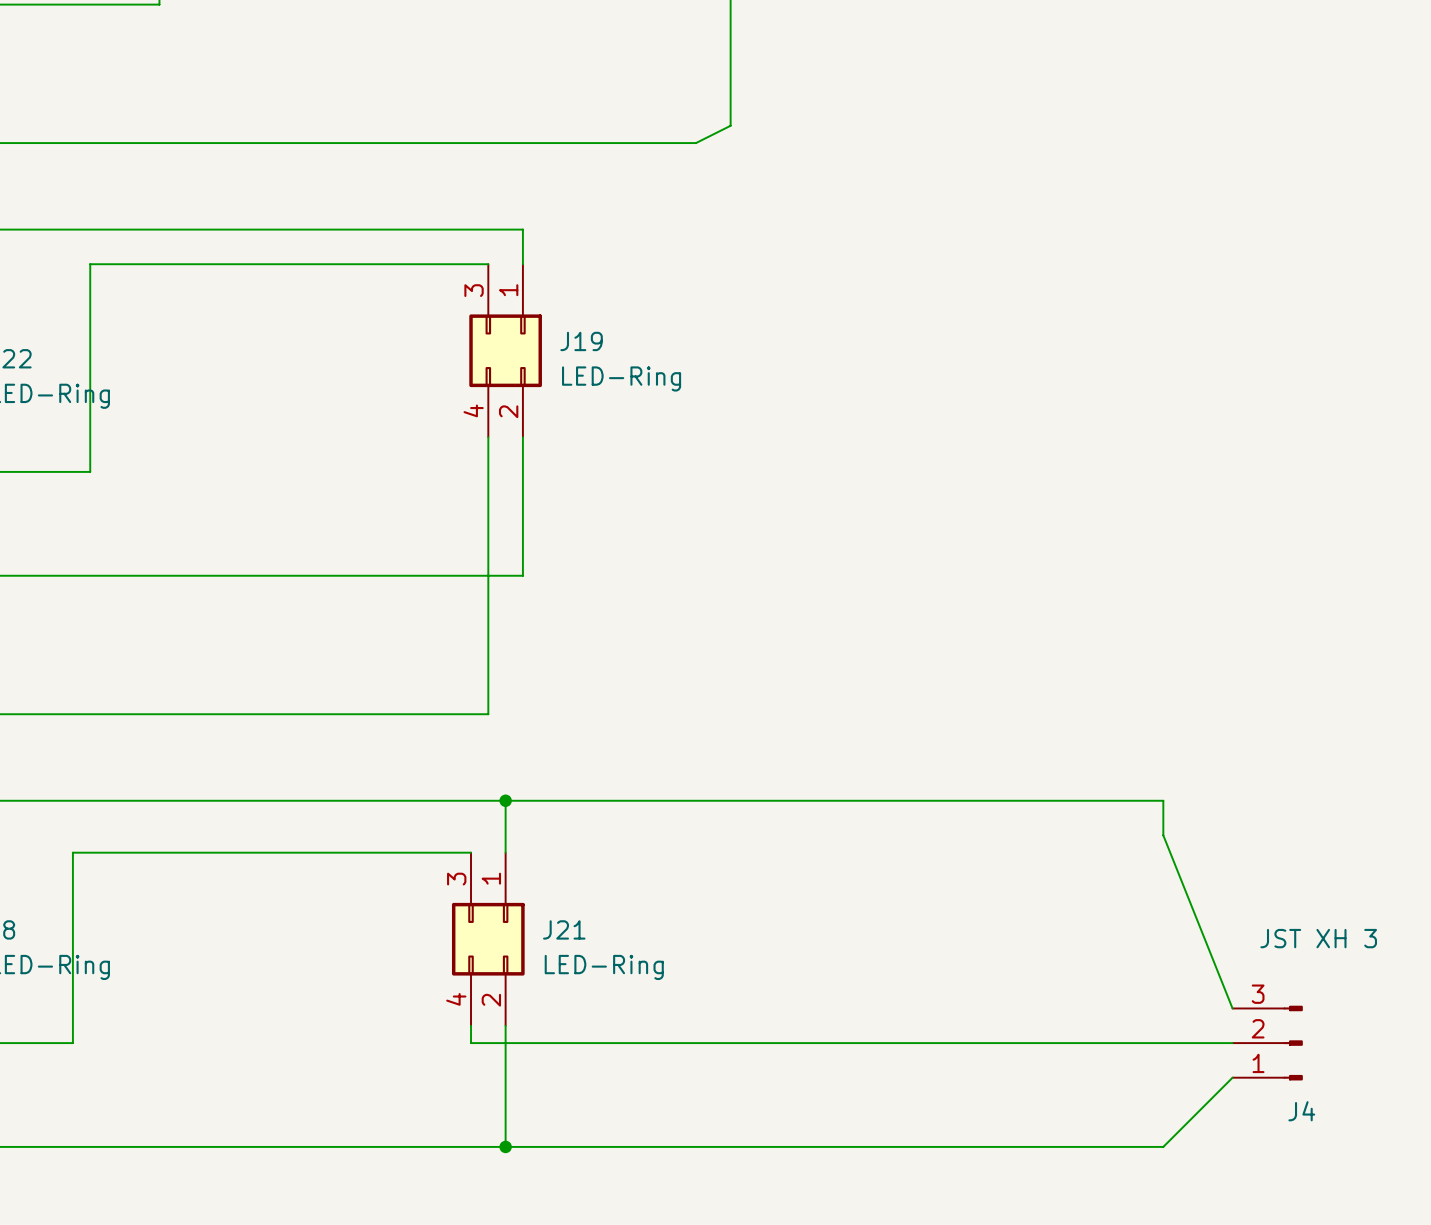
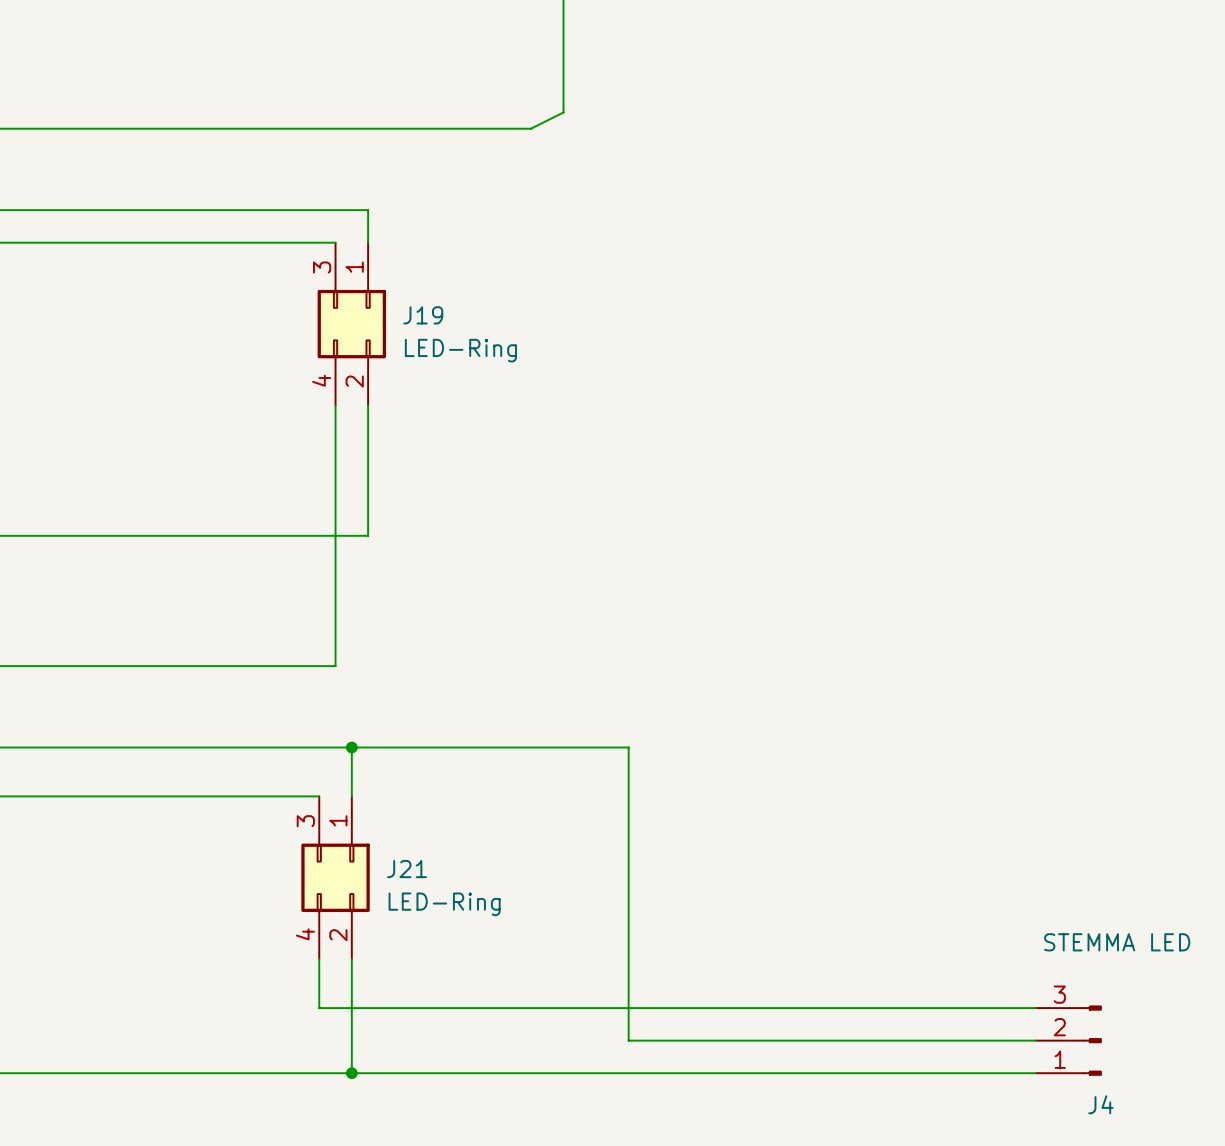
wire: (799, 800) (1163, 800) (1163, 835) (1232, 1008) -> (628, 747) (628, 1040) (1035, 1040)
J4 value: JST XH 3 (1318, 938) -> STEMMA LED (1117, 942)
wire: (471, 1043) (1232, 1043) -> (319, 975) (319, 1008) (1035, 1008)
J4 position: (1267, 1043) -> (1068, 1040)
wire: (1232, 1077) (1163, 1146) -> (1035, 1073) (970, 1073)

